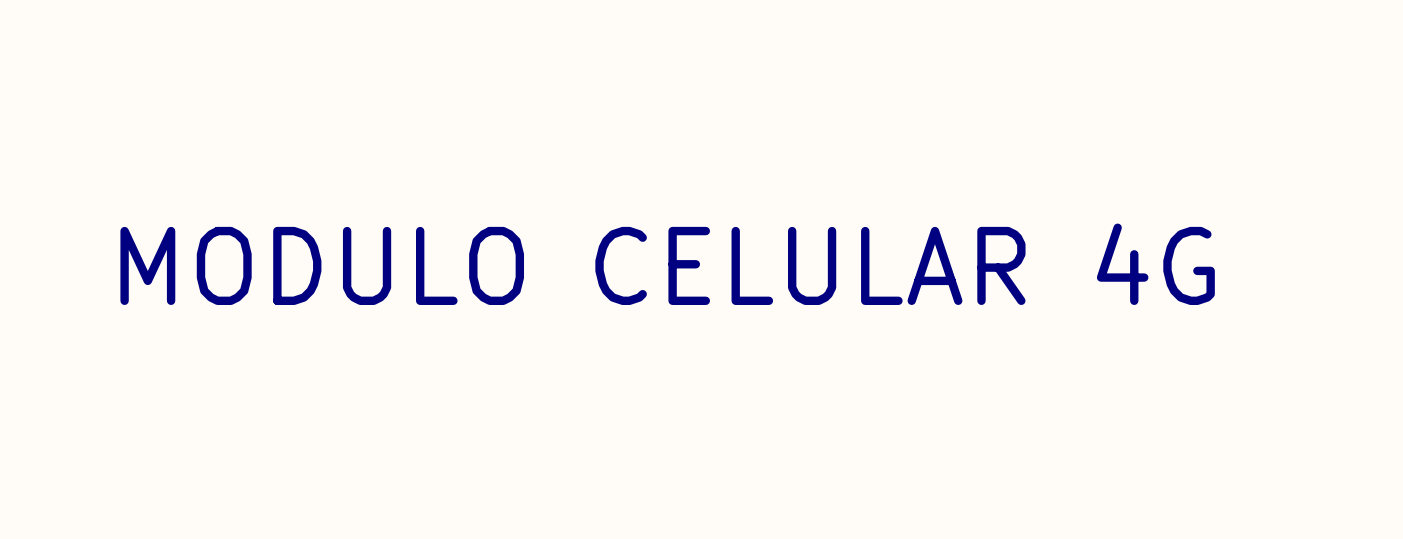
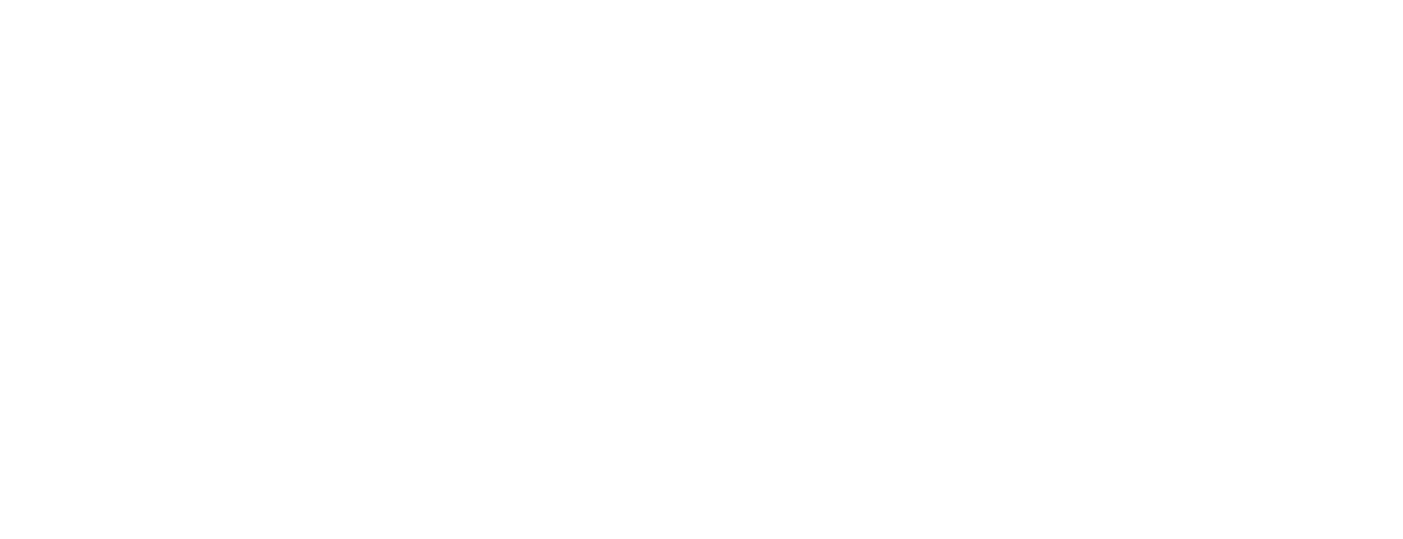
text: MODULO CELULAR 4G (667, 264) -> none

